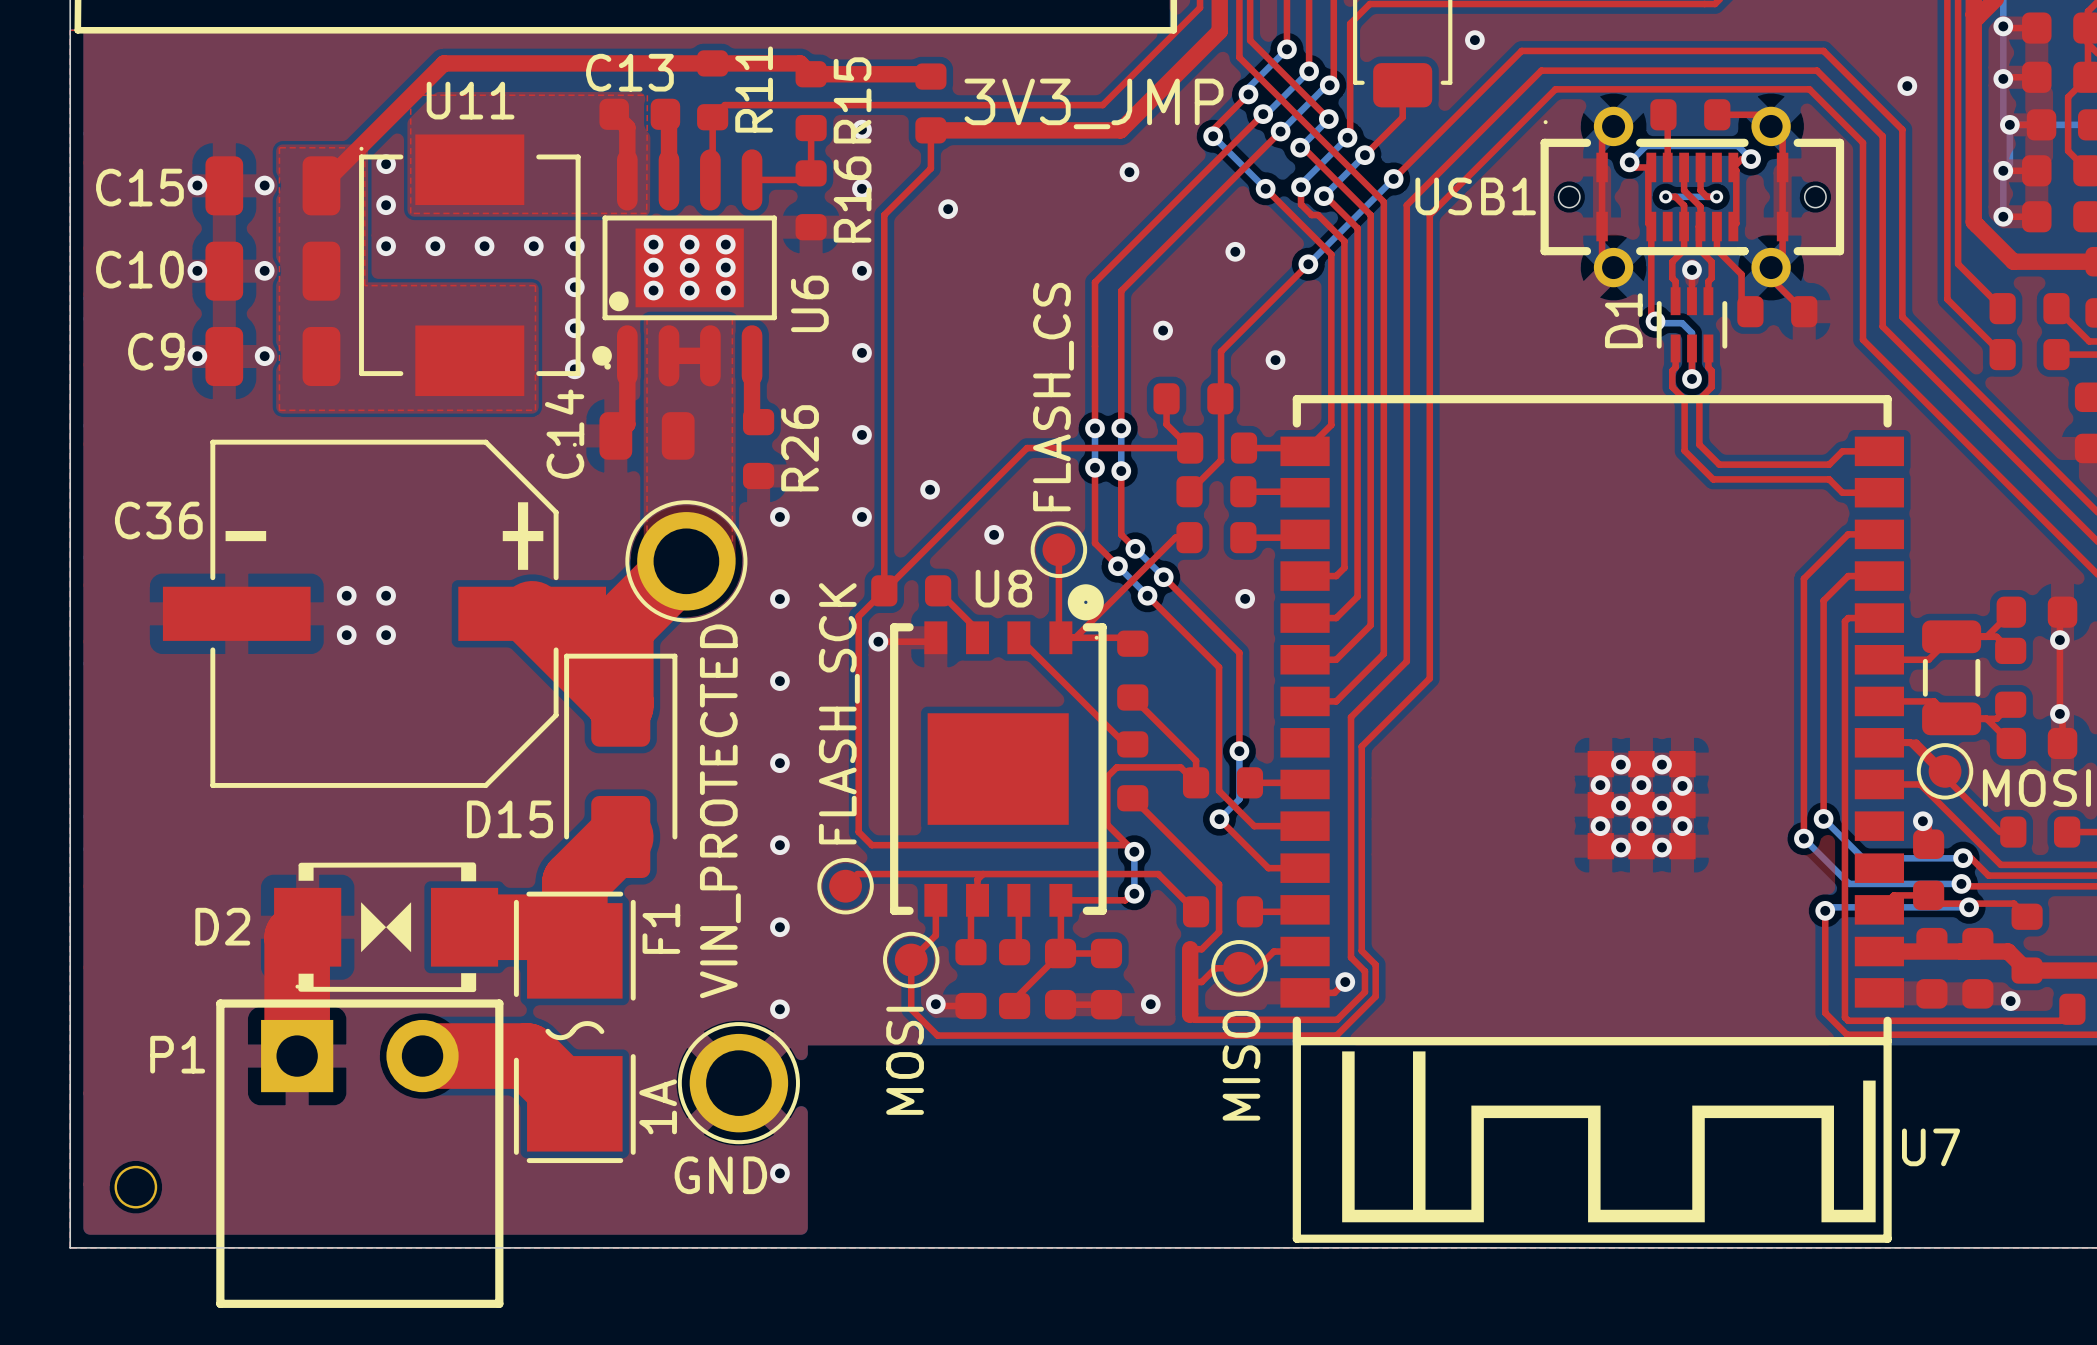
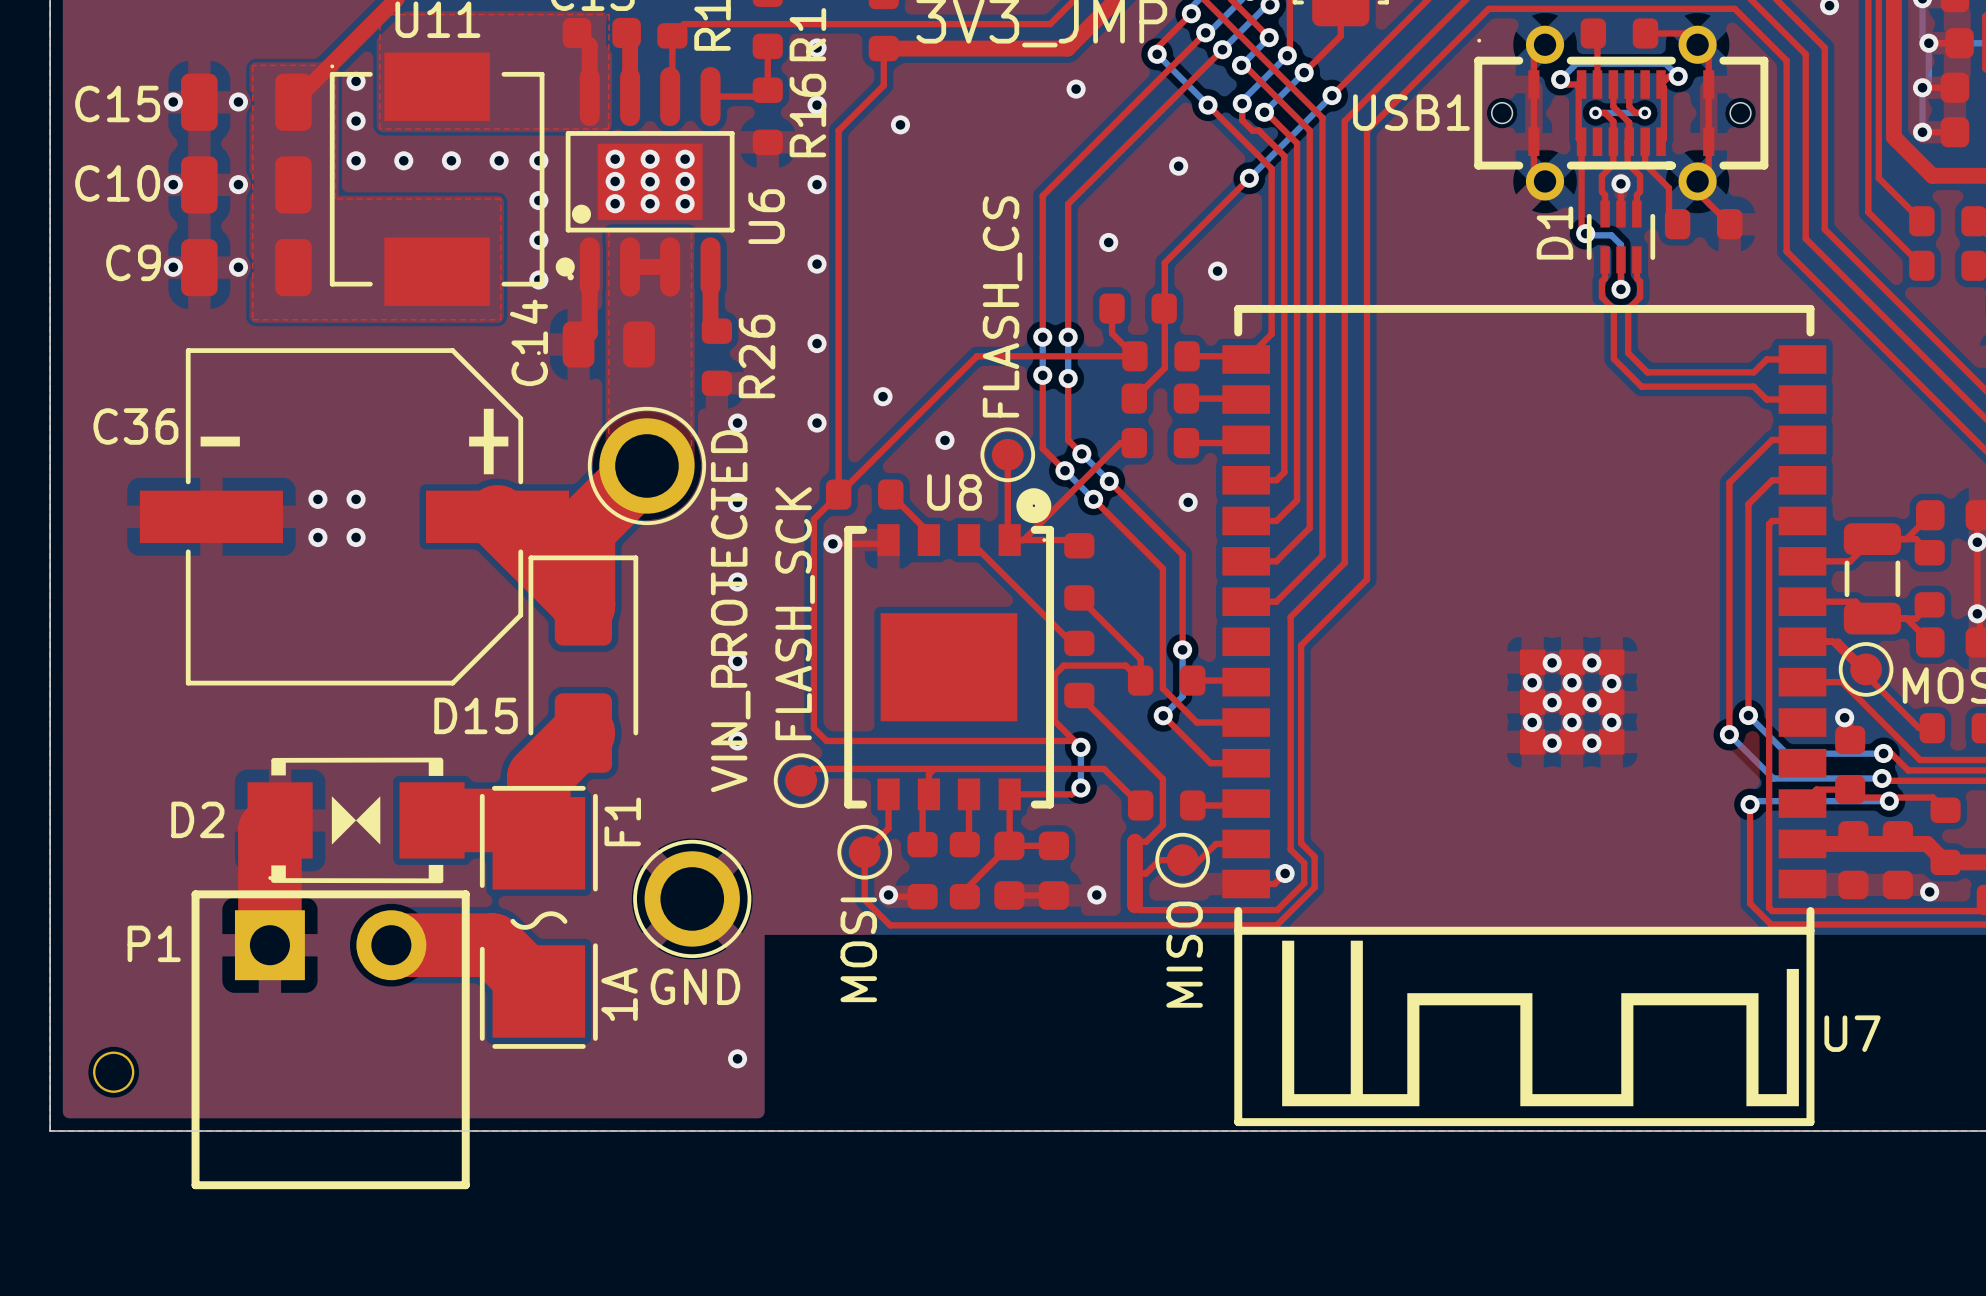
part value position: VIN_PROTECTED (720, 811) -> VIN_PROTECTED (730, 611)
via: (779, 927) -> none
via: (779, 1009) -> none
part position: (738, 1083) -> (692, 898)
part value position: GND (720, 1175) -> GND (695, 986)

